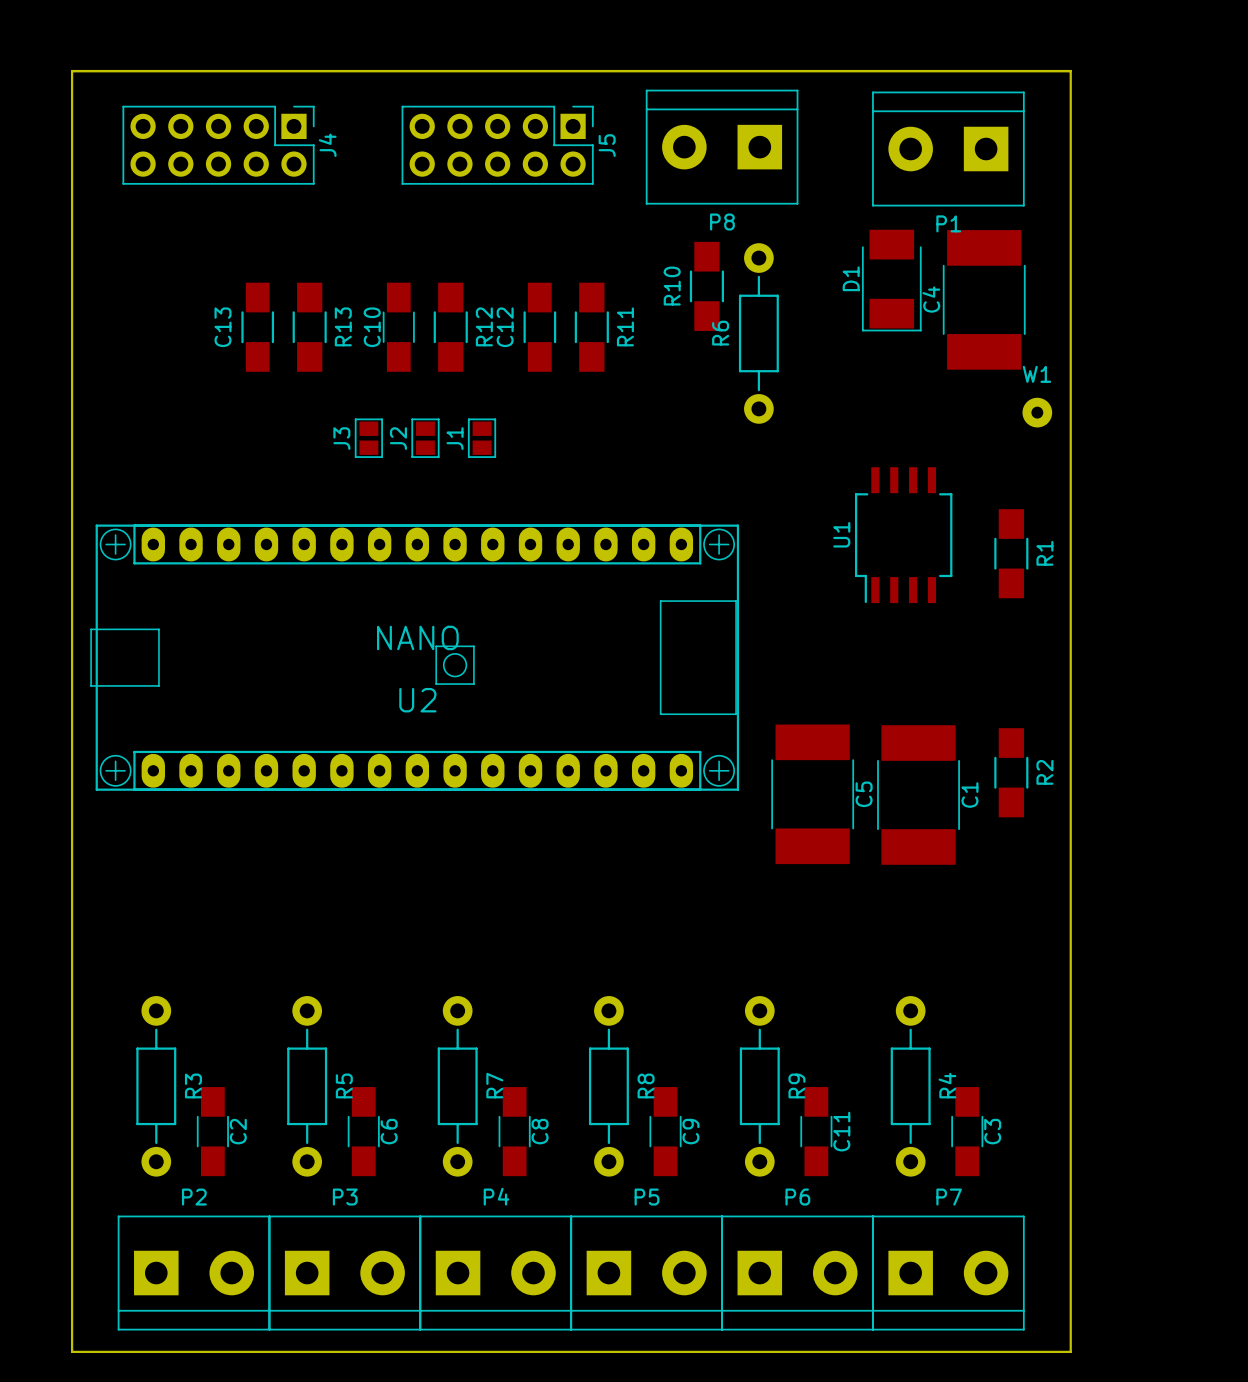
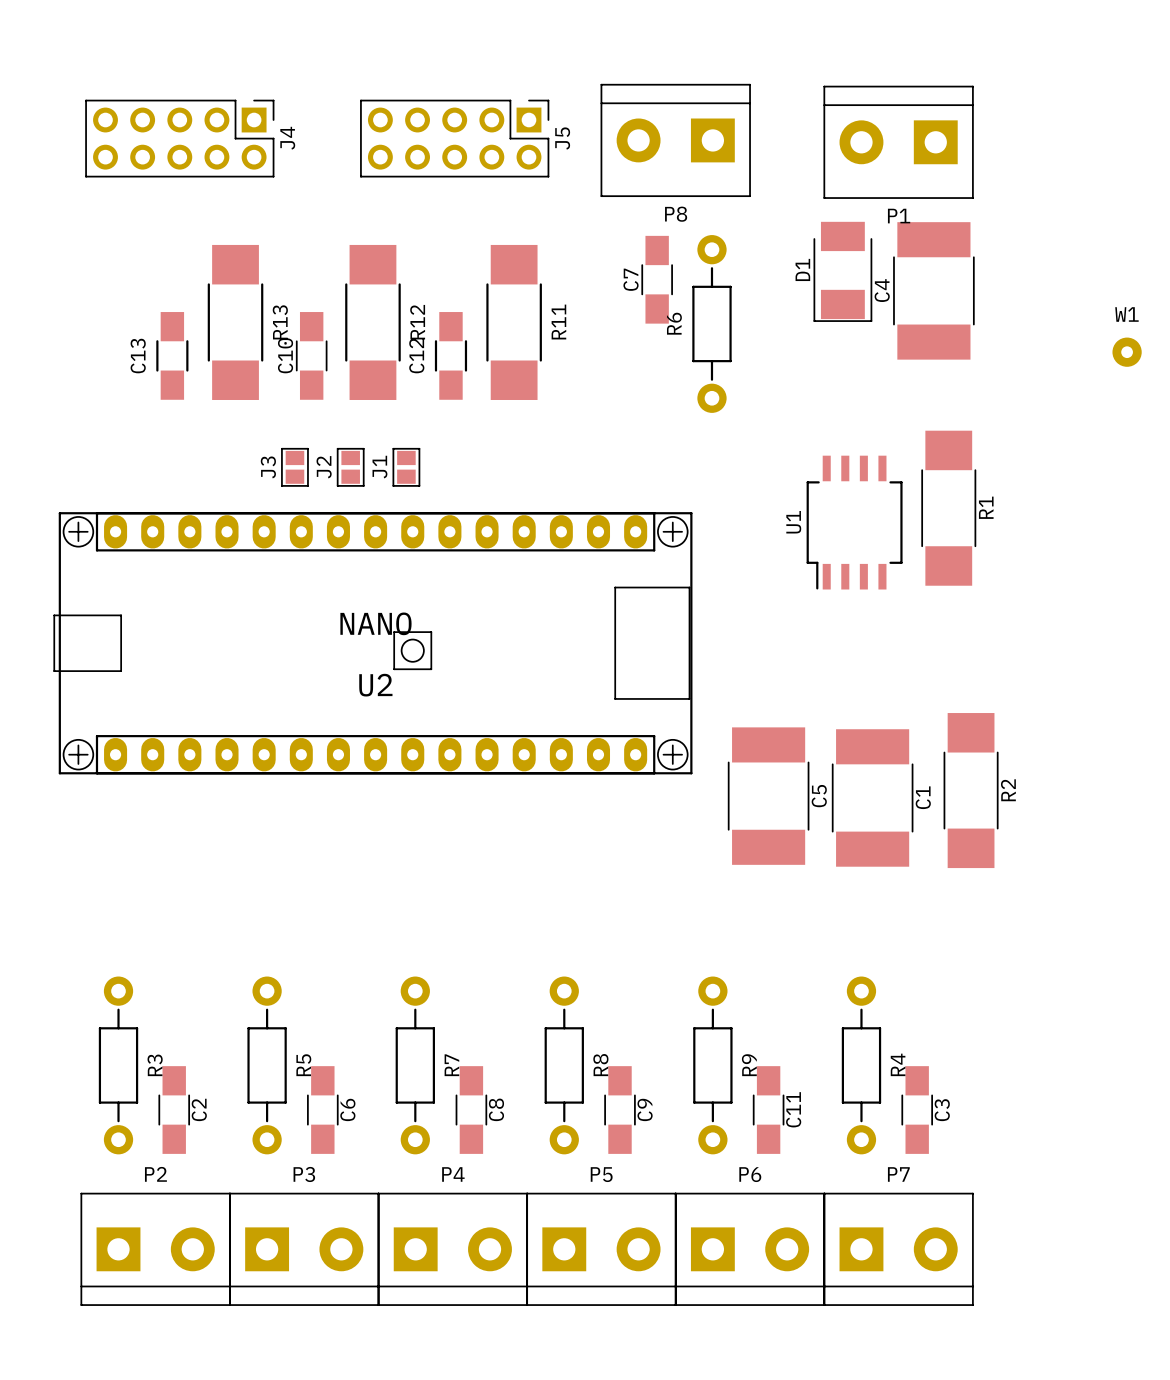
board edge: (72, 71) (72, 1351) (1070, 1351) (1070, 71) (72, 71) -> none
R13 footprint: [292, 282, 327, 372] -> [207, 244, 264, 400]
R12 footprint: [433, 282, 468, 372] -> [345, 244, 401, 400]
R11 footprint: [574, 282, 609, 372] -> [486, 244, 542, 400]
R10: (706, 286) -> none
C7: none -> (657, 279)
C13 position: (257, 327) -> (172, 355)
C10 position: (398, 327) -> (311, 355)
C12 position: (539, 327) -> (450, 355)
W1 position: (1037, 412) -> (1127, 352)
J3 position: (368, 438) -> (294, 467)
J2 position: (425, 438) -> (350, 467)
J1 position: (482, 438) -> (406, 467)
R1 footprint: [994, 509, 1029, 599] -> [921, 430, 977, 586]
R2 footprint: [994, 728, 1029, 818] -> [943, 713, 999, 869]
C5 position: (812, 794) -> (768, 796)
C1 position: (918, 795) -> (872, 797)

